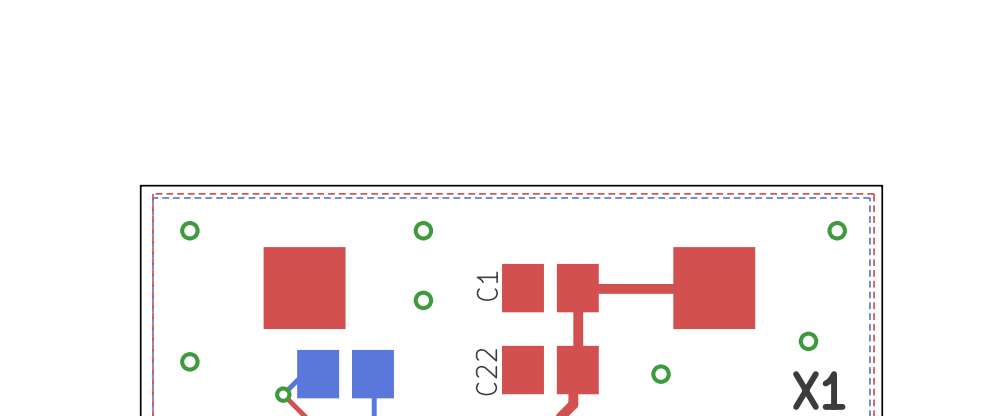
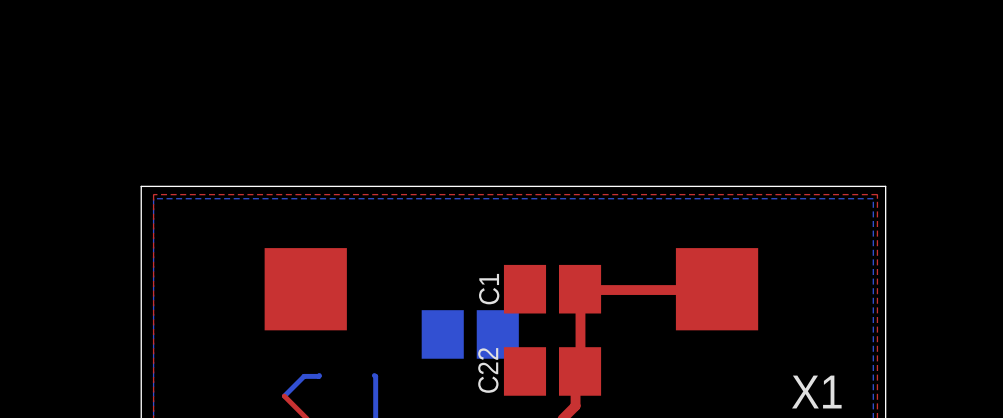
via: (189, 230) -> none
via: (423, 230) -> none
via: (837, 230) -> none
via: (423, 300) -> none
via: (808, 341) -> none
via: (189, 361) -> none
part position: (345, 374) -> (470, 334)
via: (661, 374) -> none
via: (283, 394) -> none

